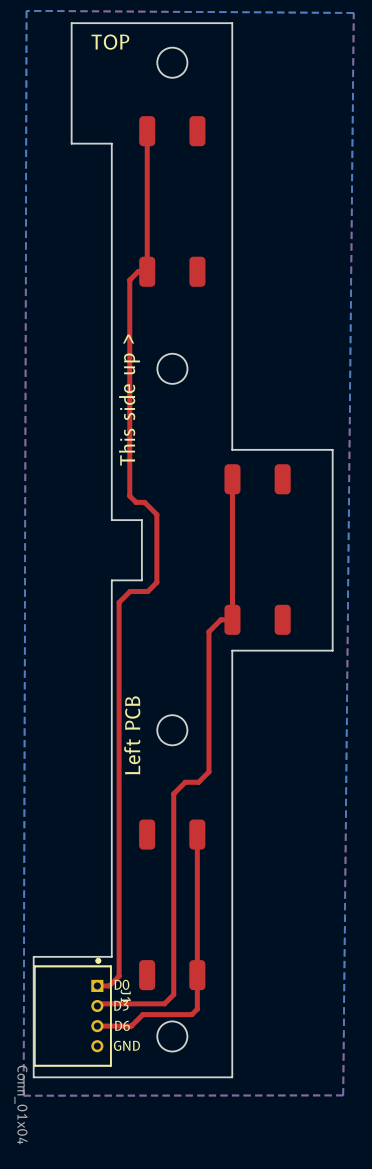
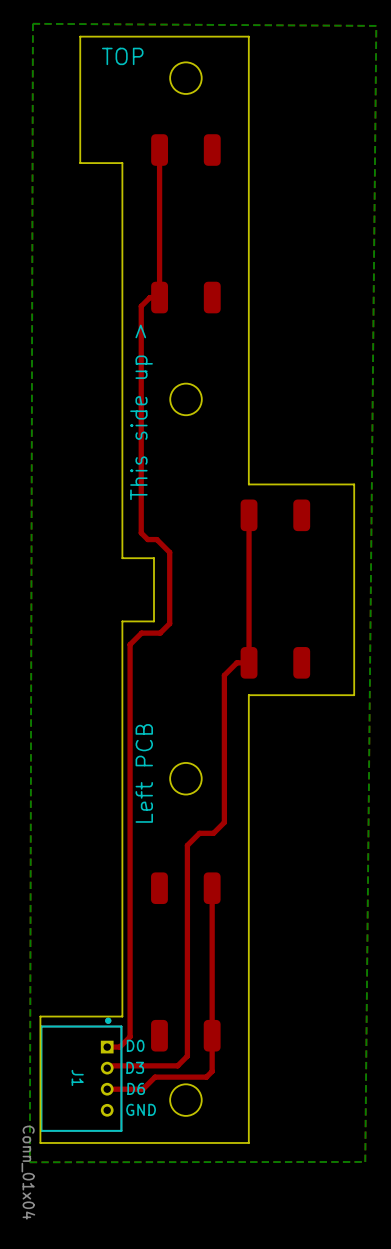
J1 name position: J1 (125, 996) -> J1 (77, 1077)

